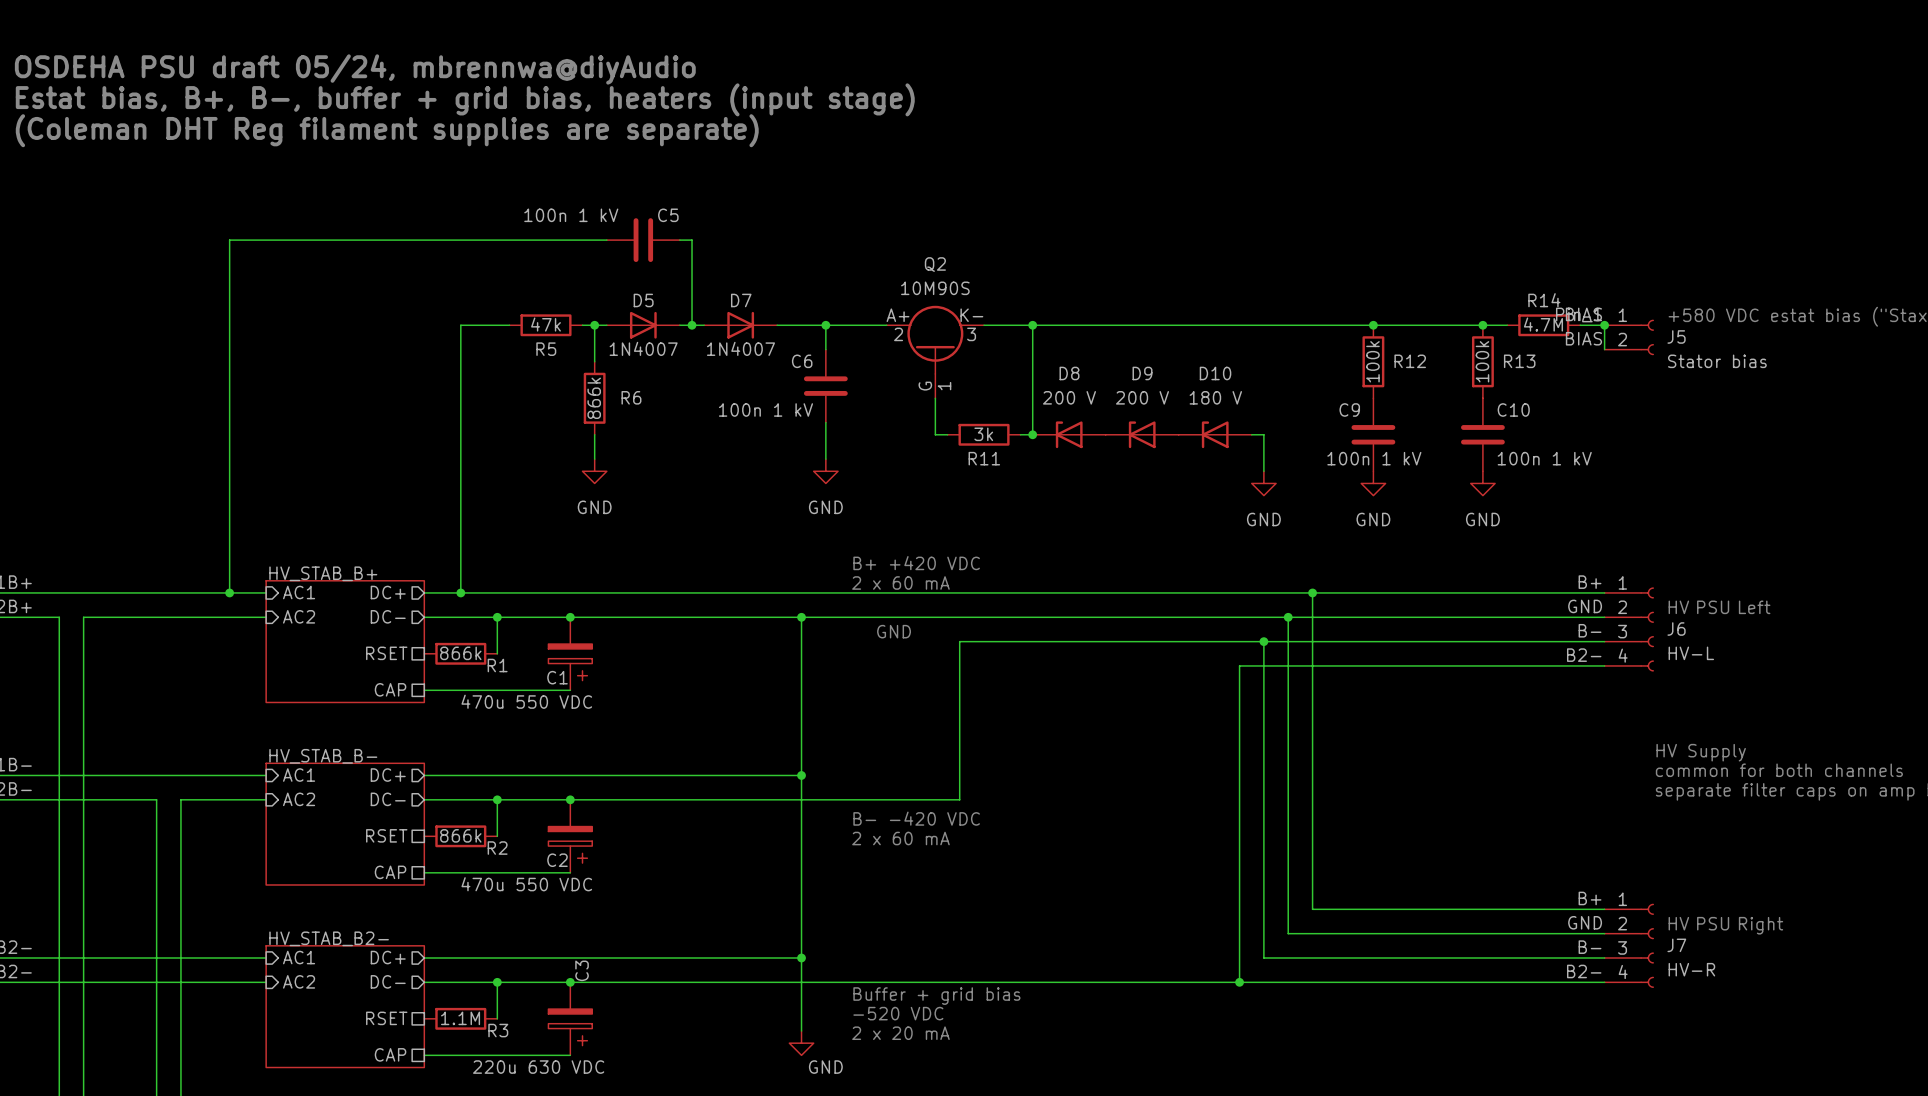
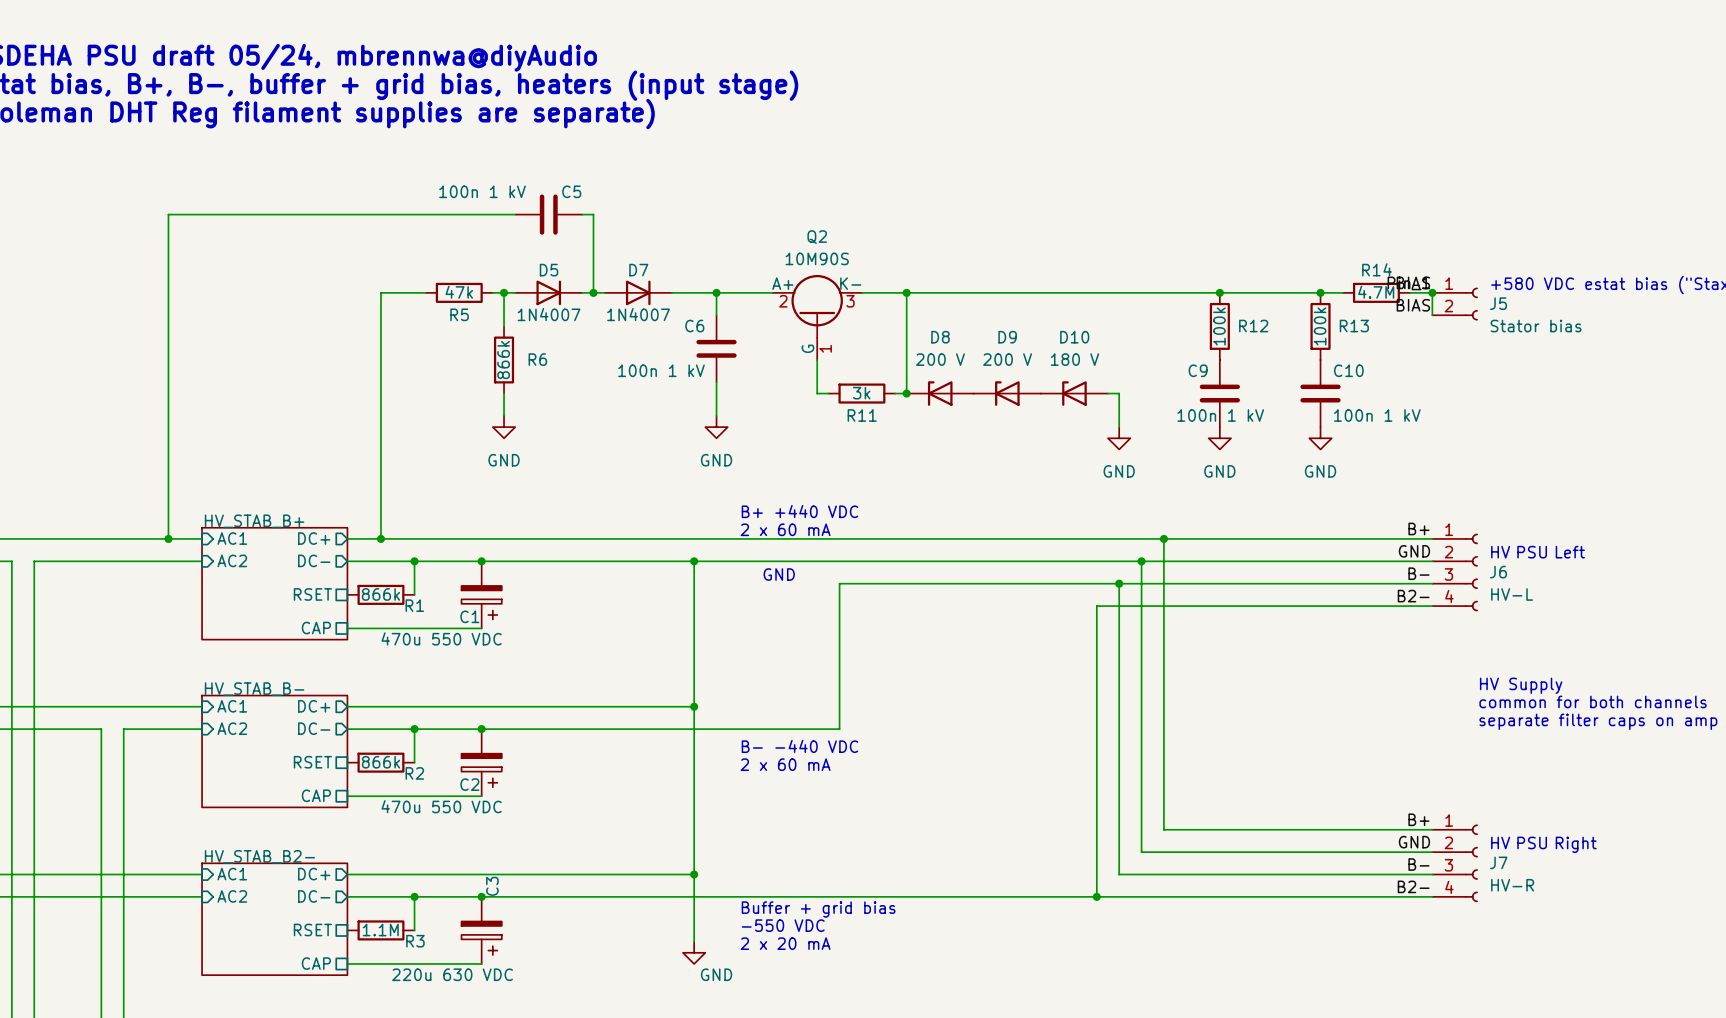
text: B+ +420 VDC (916, 563) -> B+ +440 VDC (799, 511)
text: B- -420 VDC (916, 818) -> B- -440 VDC (799, 746)
text: -520 VDC (898, 1013) -> -550 VDC (783, 925)

